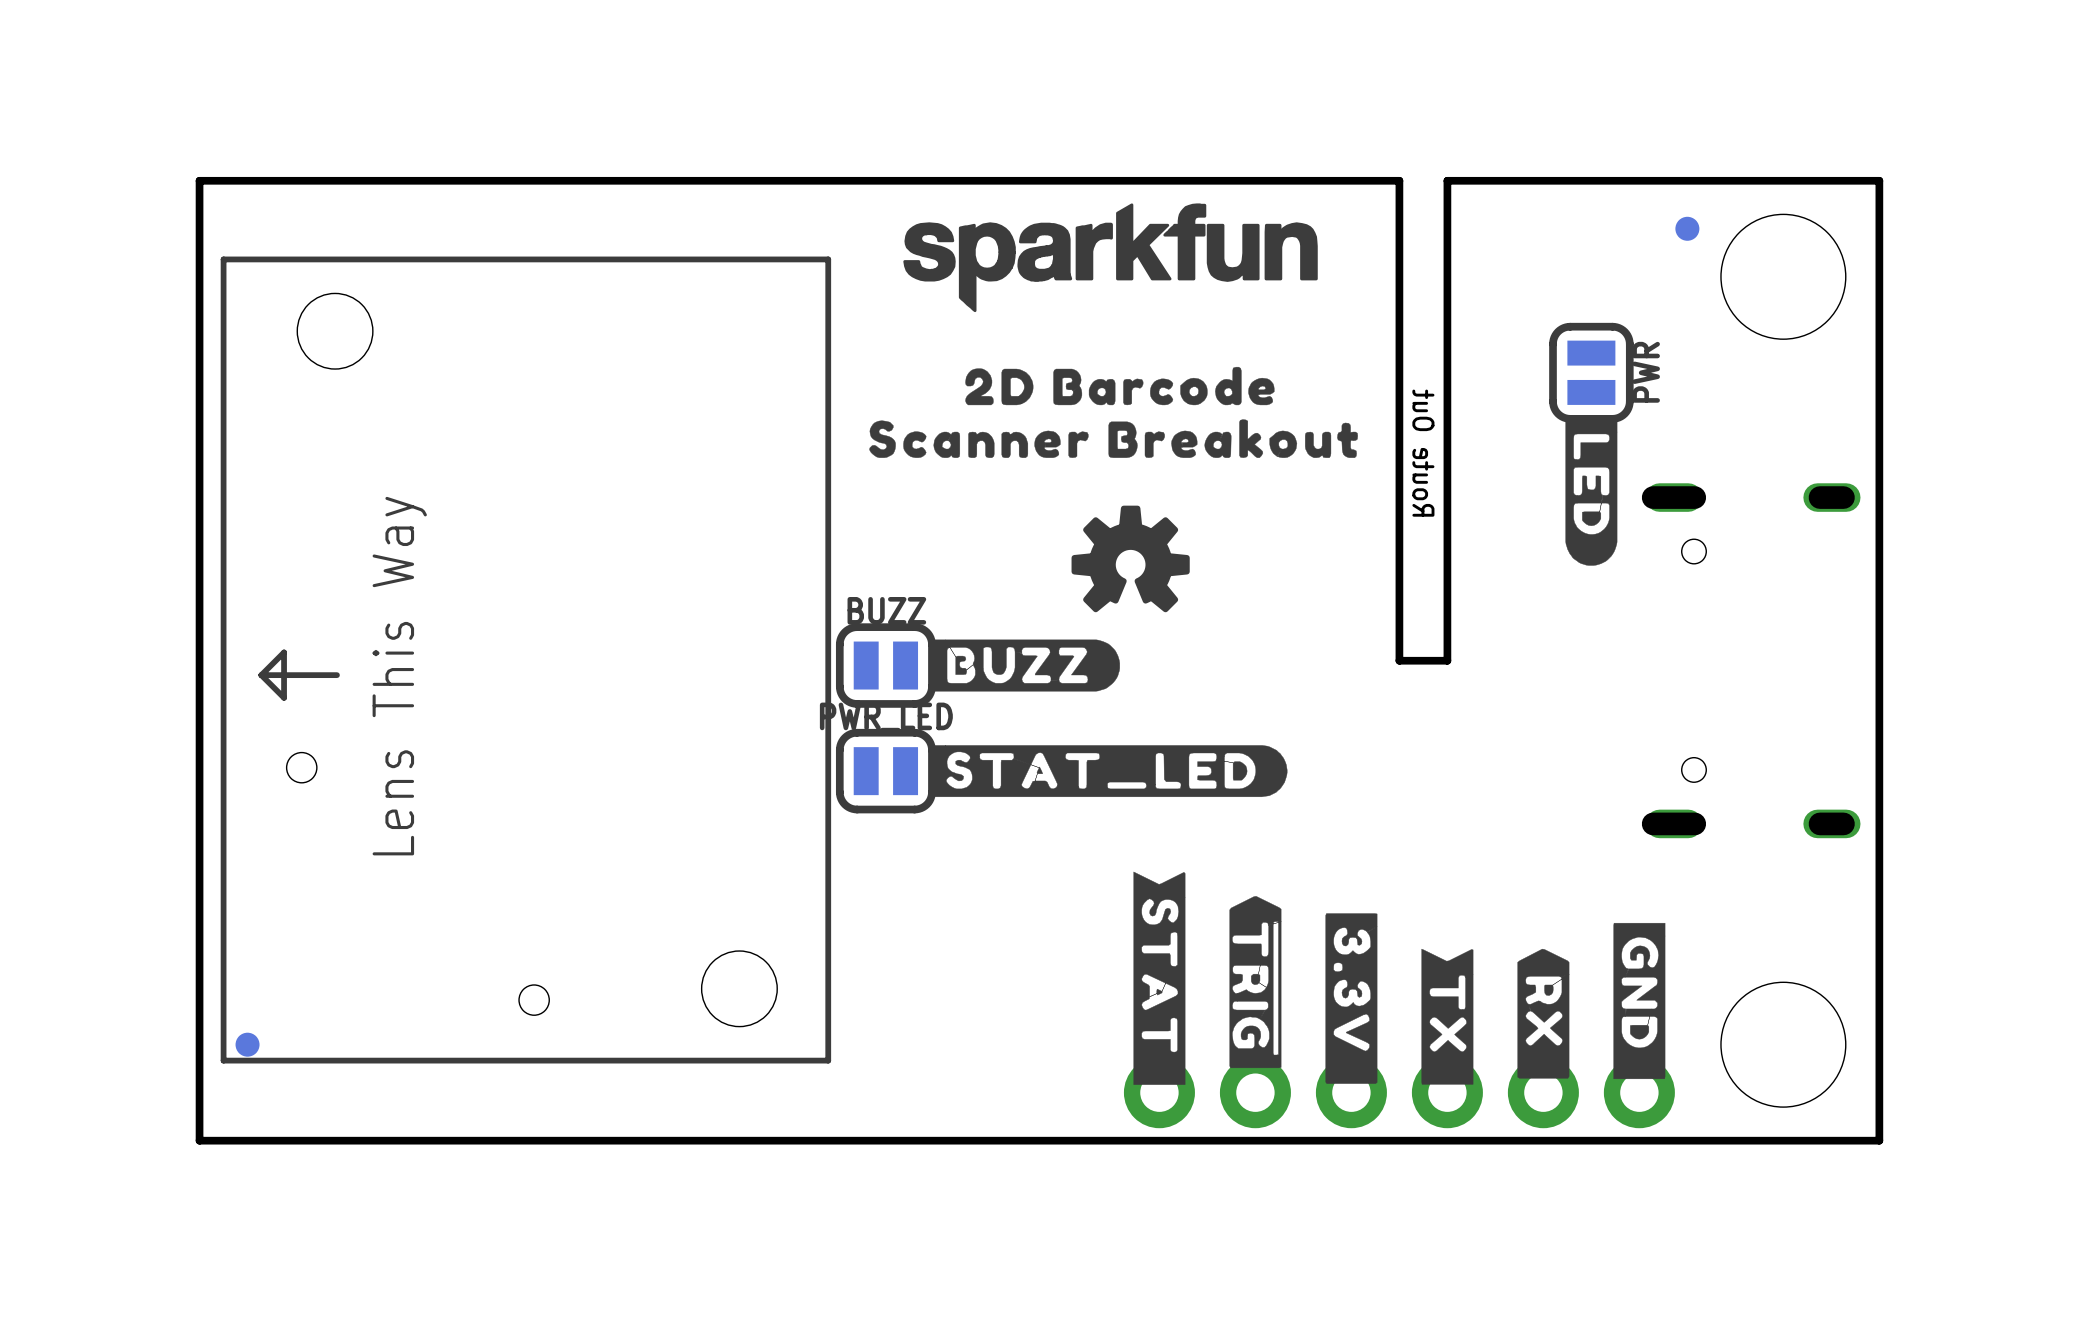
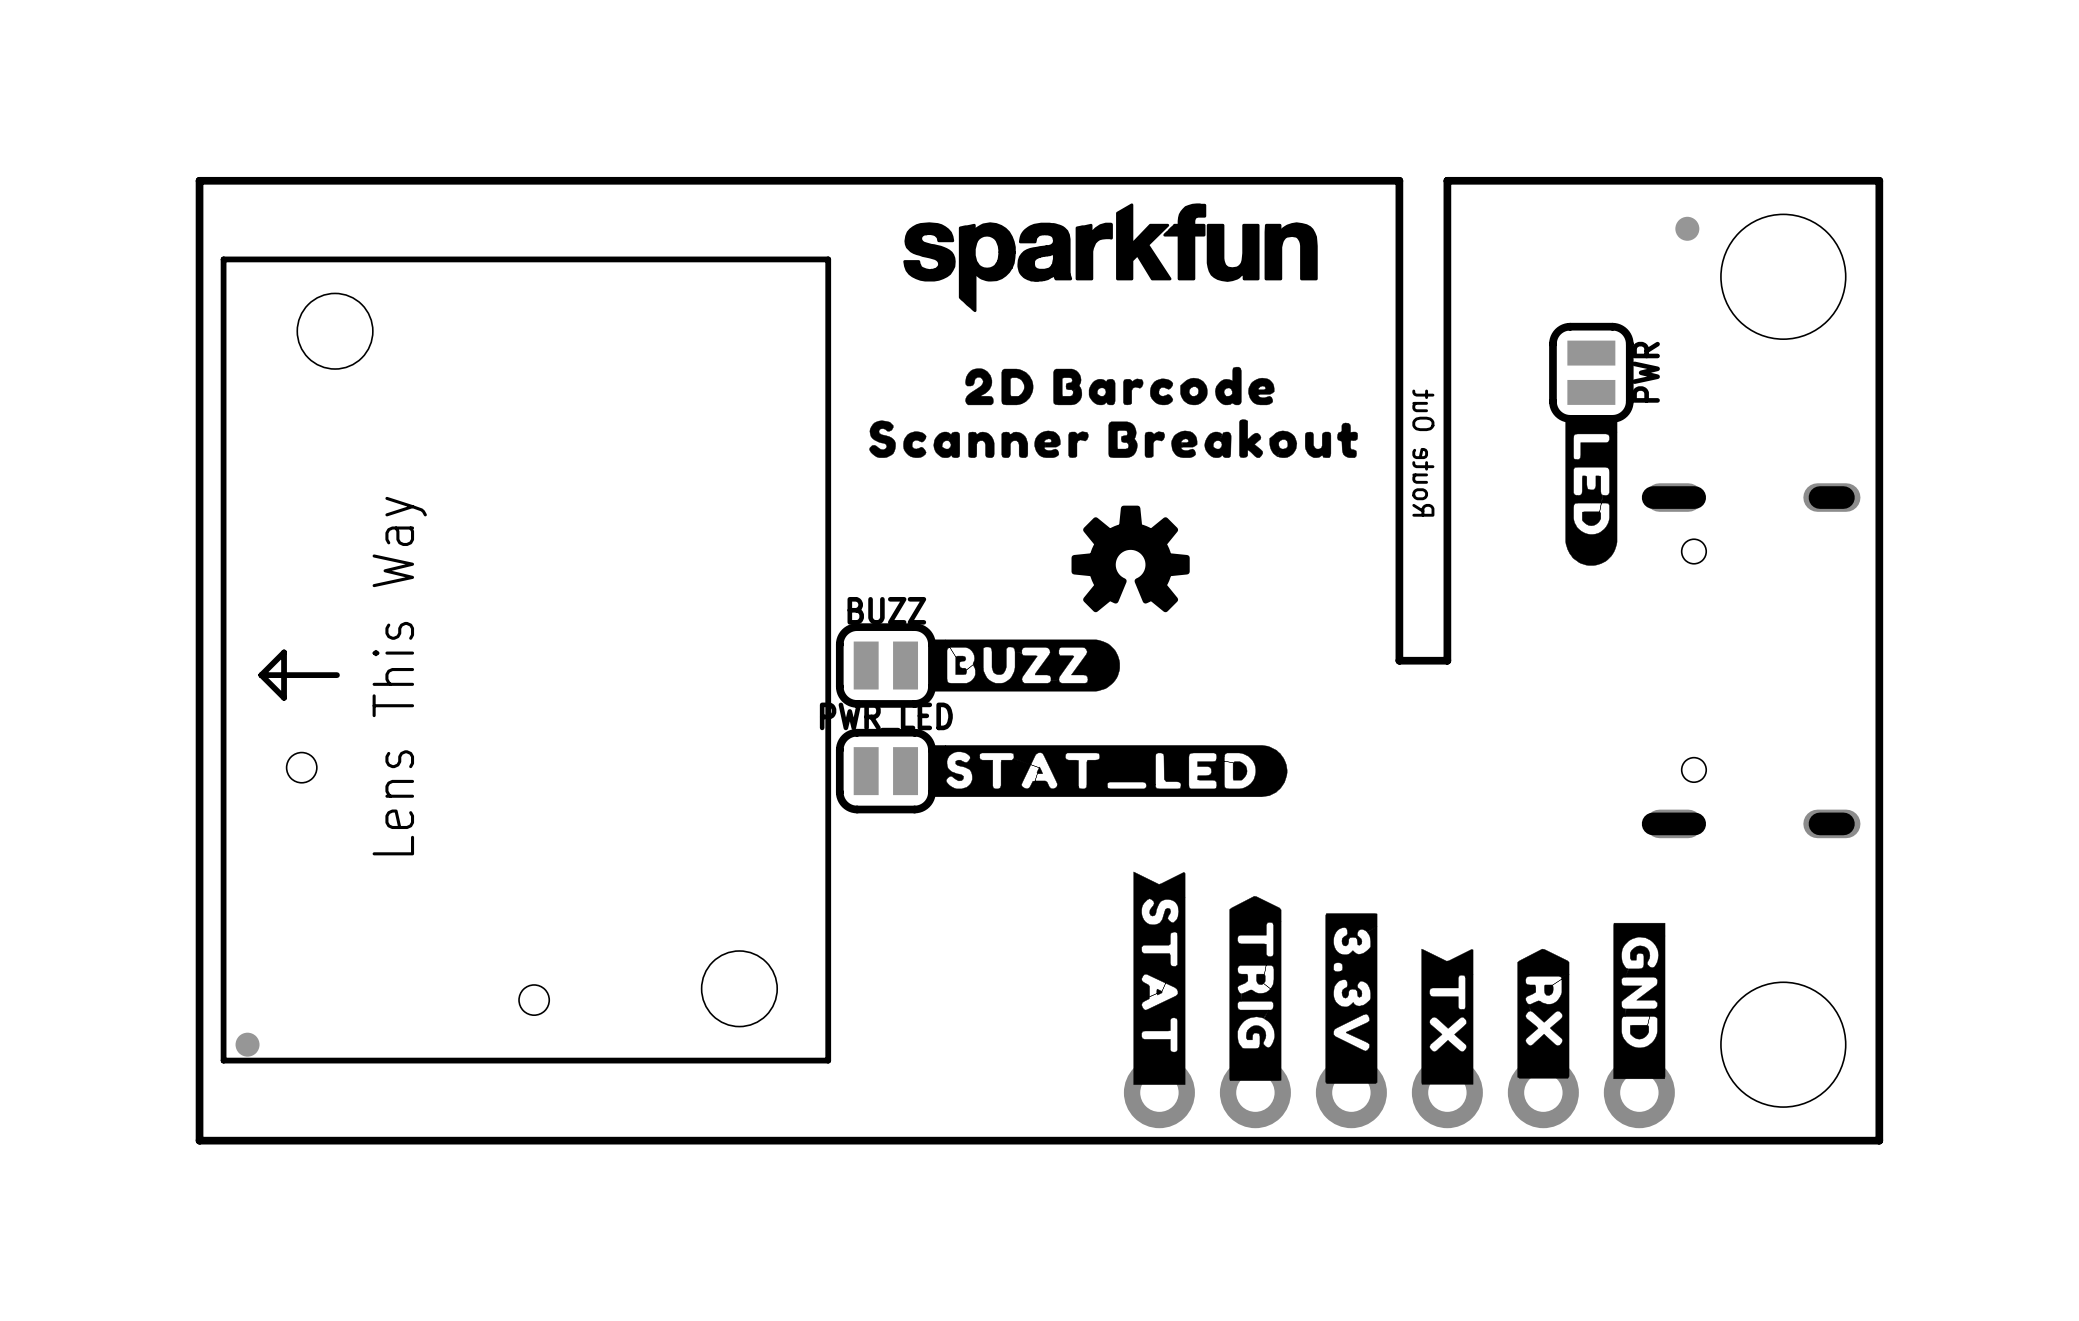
drawing shape: [1229, 896, 1282, 1069] -> [1229, 896, 1282, 1081]

